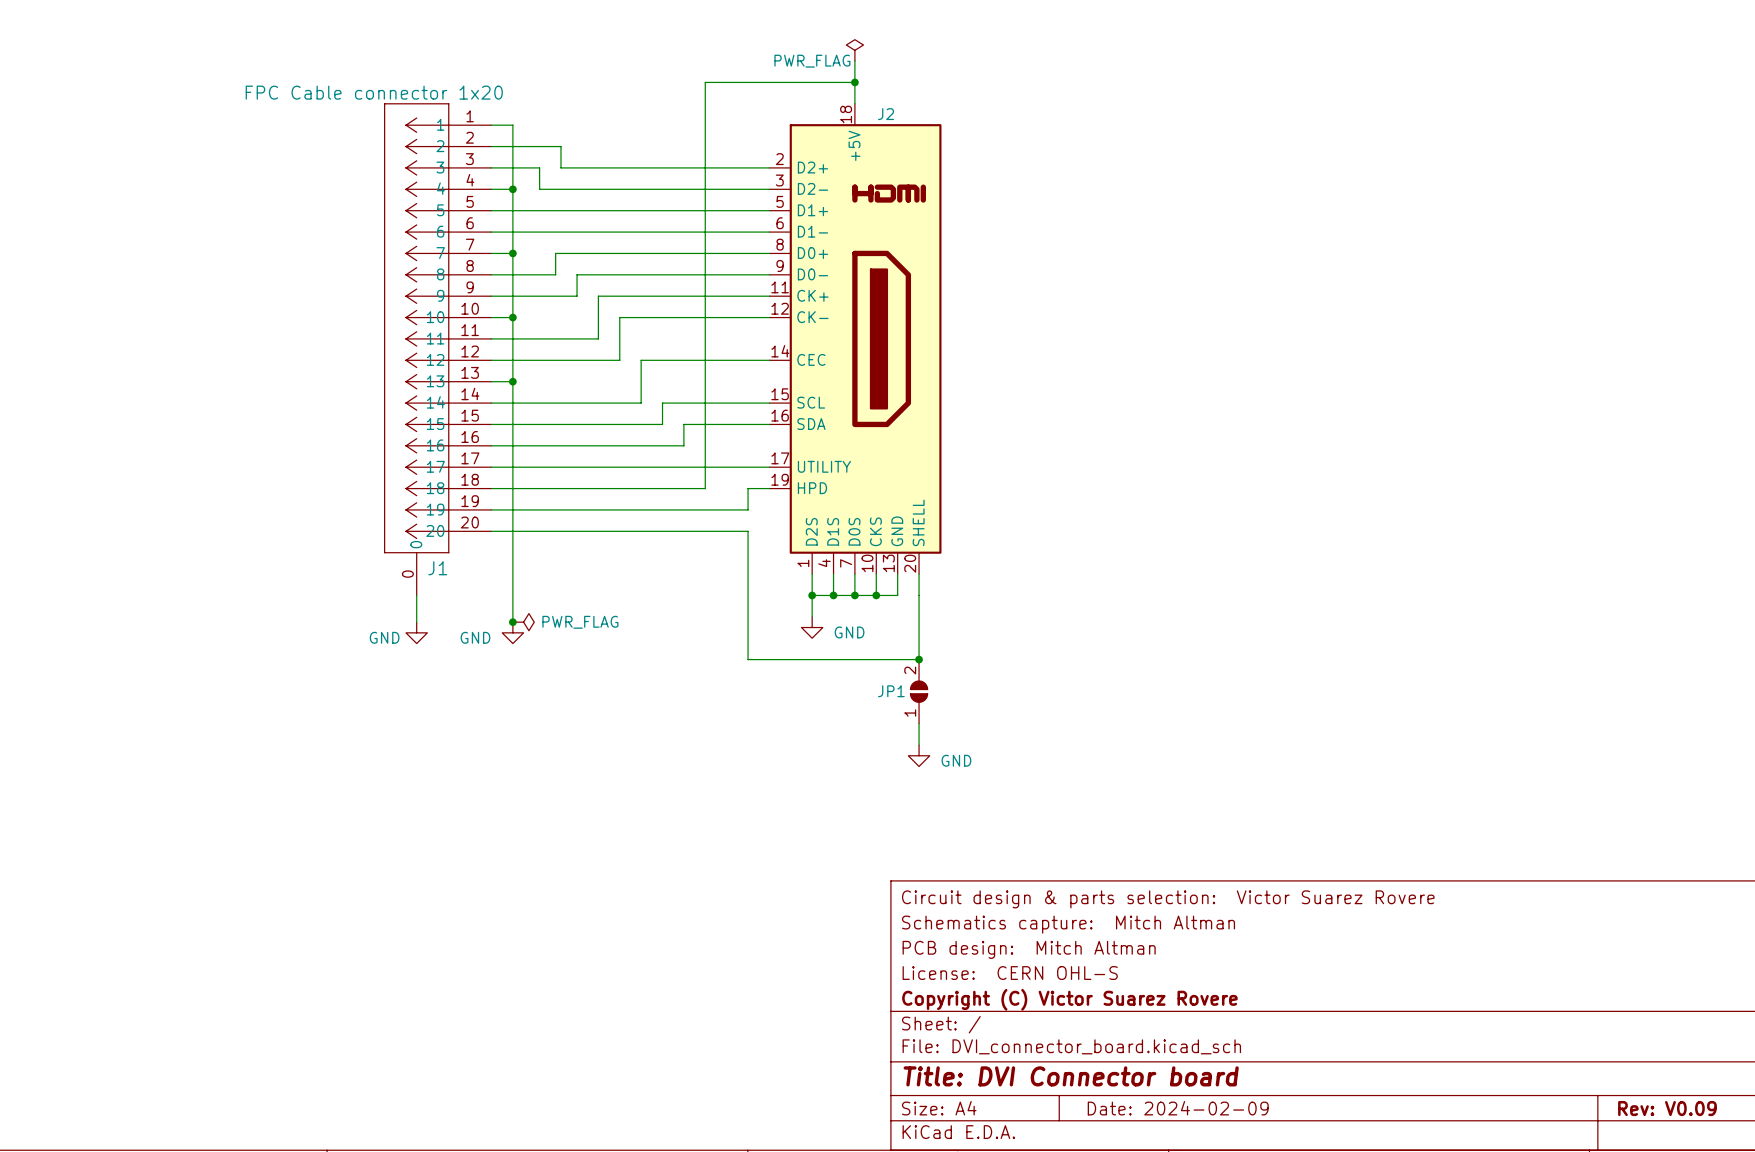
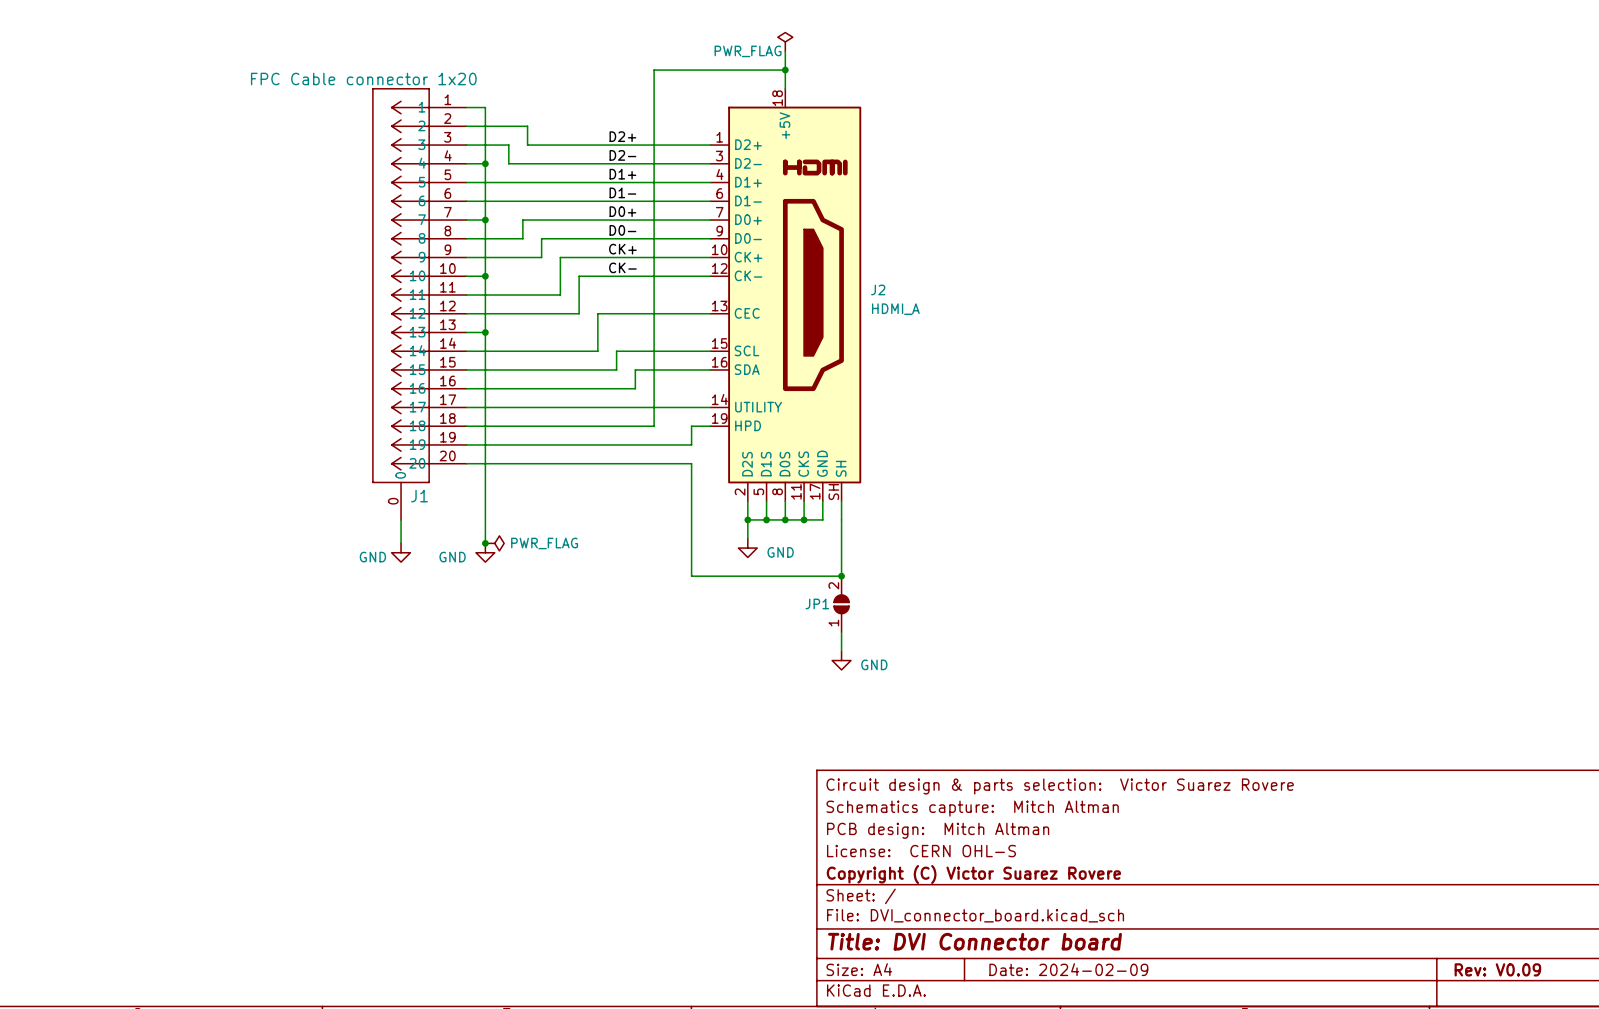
J2 symbol: [769, 103, 942, 575] -> [710, 88, 862, 502]
J2 name position: J2 (886, 114) -> J2 (878, 289)
label: none -> D2+ (622, 136)
label: none -> D2- (622, 155)
label: none -> D1+ (622, 174)
label: none -> D1- (622, 192)
label: none -> D0+ (622, 211)
label: none -> D0- (622, 230)
label: none -> CK+ (622, 249)
label: none -> CK- (622, 267)
J2 value: none -> HDMI_A (895, 309)

